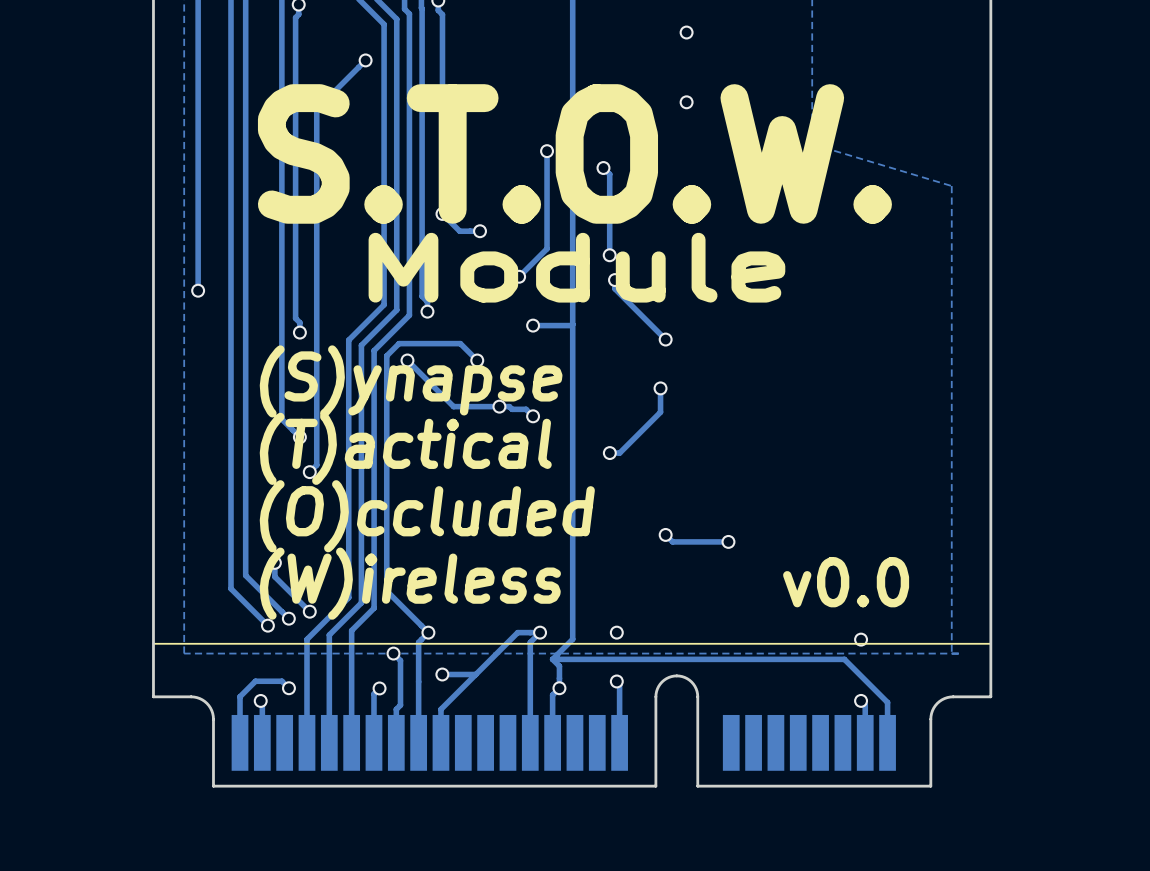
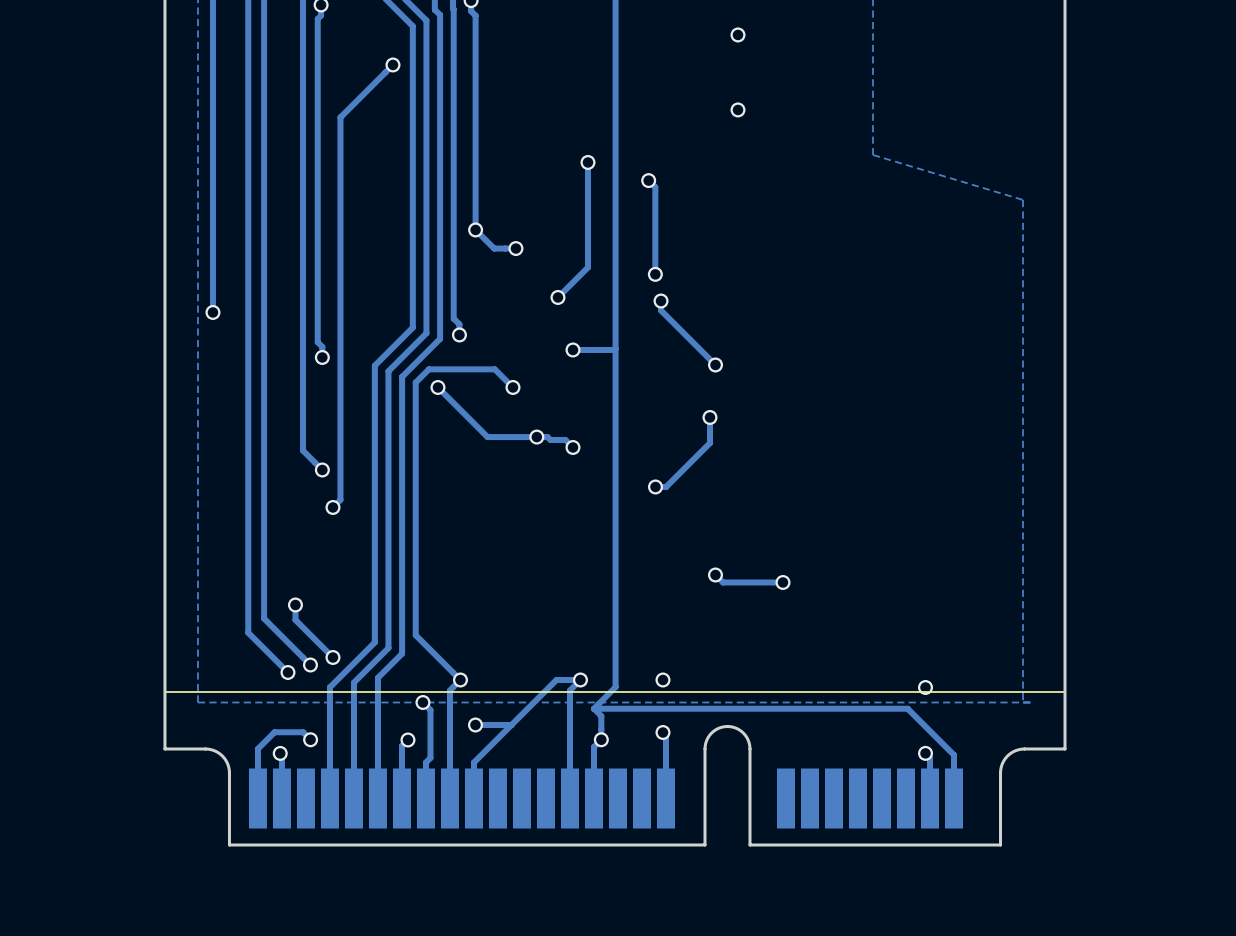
text: S.T.O.W. (574, 153) -> none
text: Module (576, 267) -> none
text: (S)ynapse (411, 381) -> none
text: (T)actical (405, 448) -> none
text: (O)ccluded (427, 516) -> none
text: v0.0 (846, 582) -> none
text: (W)ireless (410, 583) -> none

